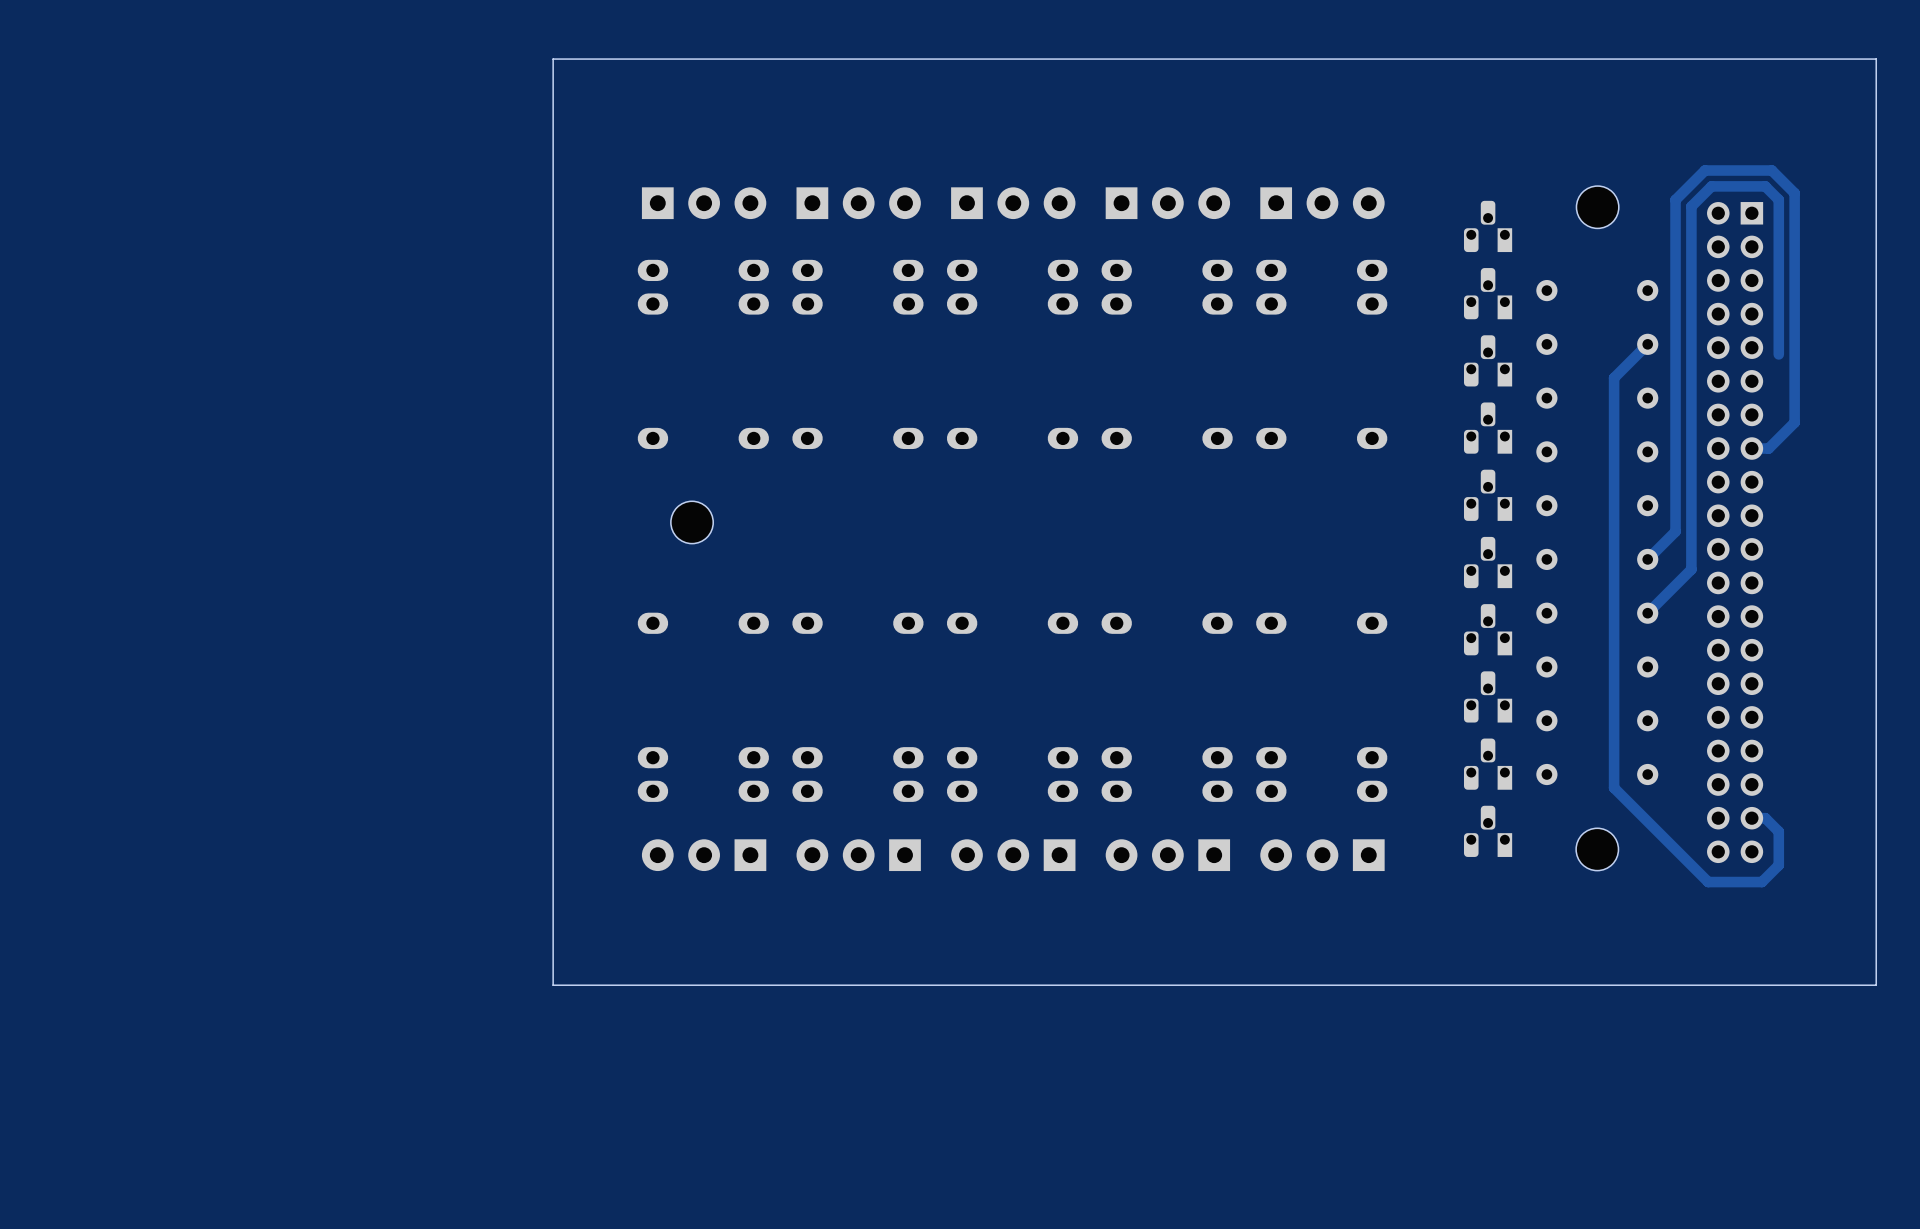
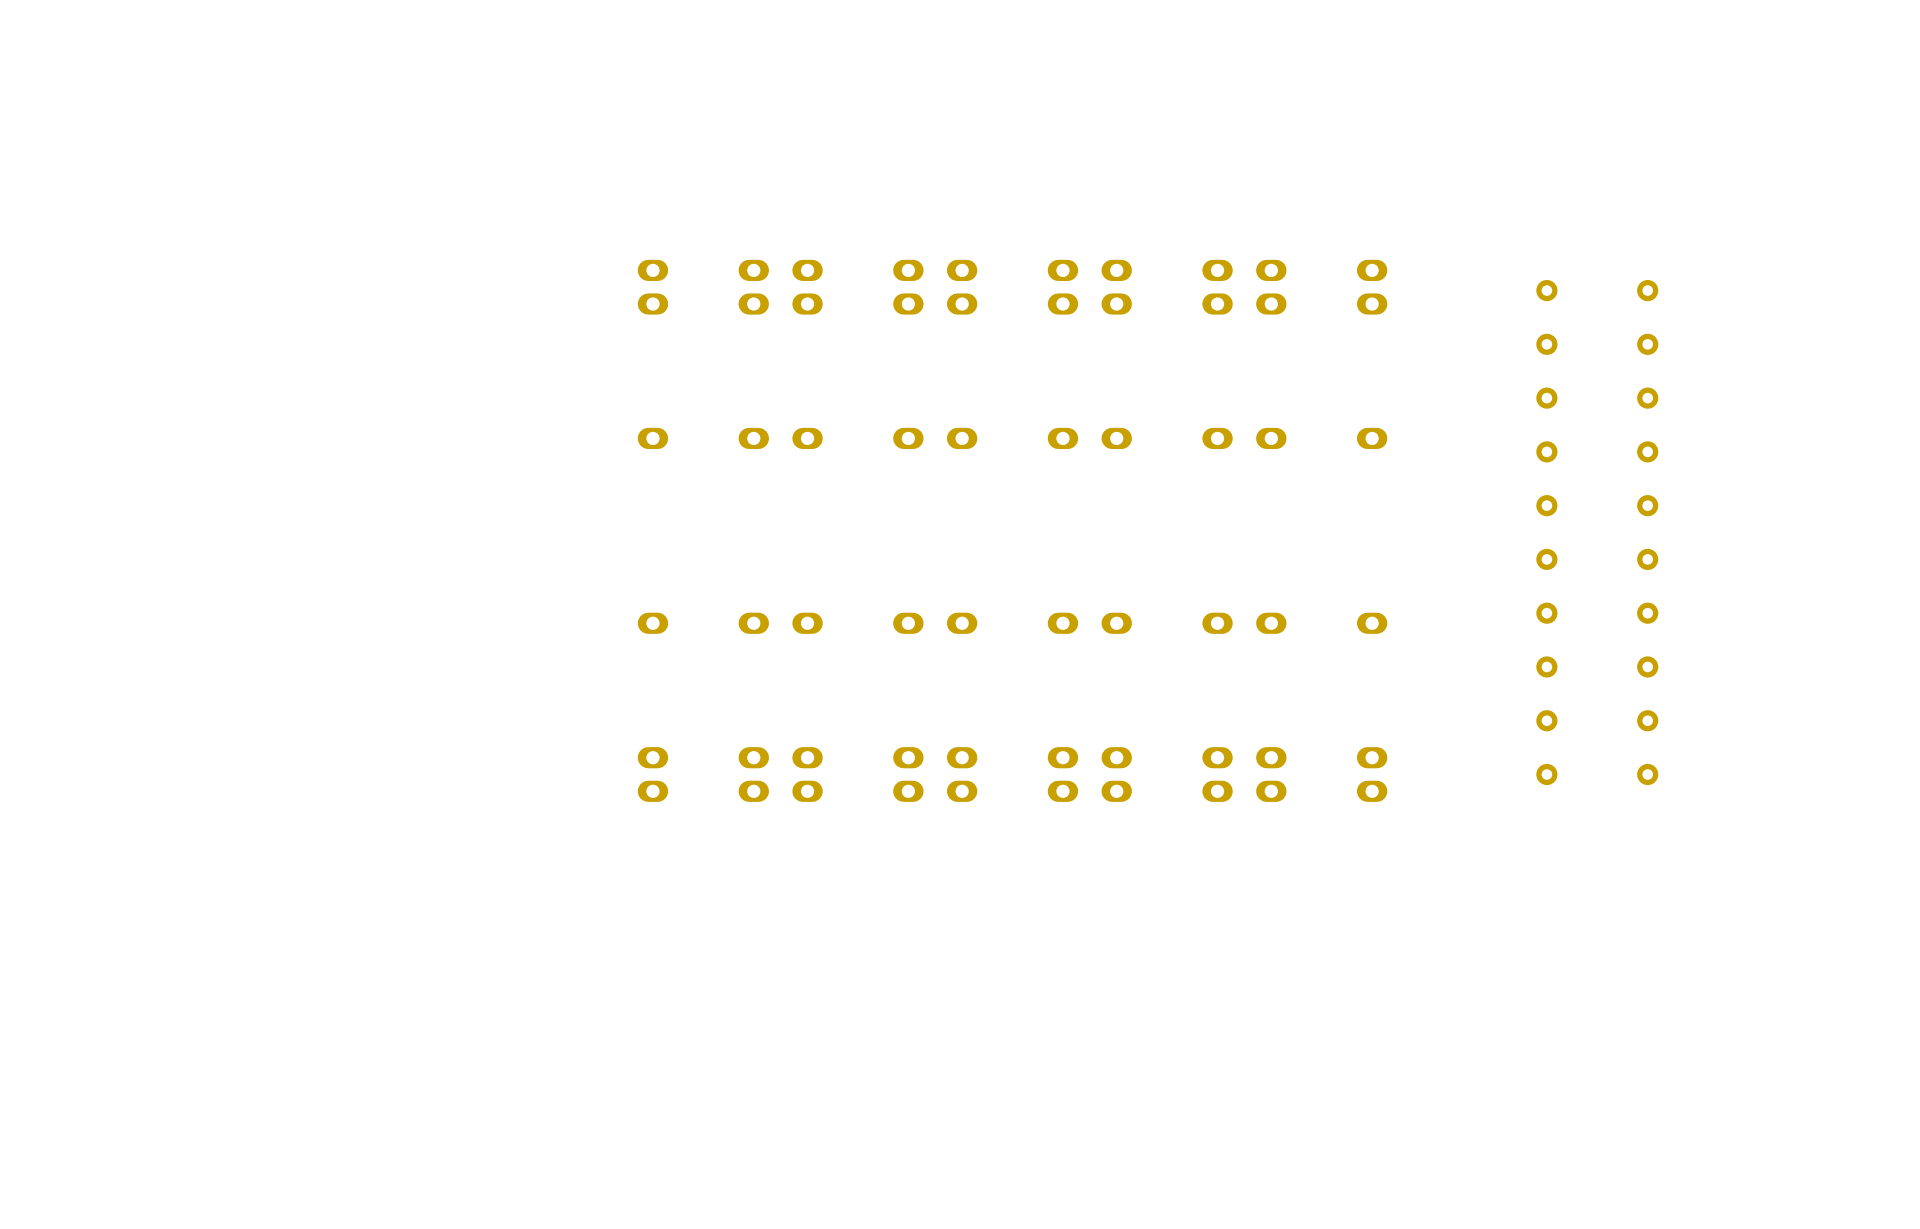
board edge: (1876, 59) (553, 59) (553, 985) (1876, 985) (1876, 59) -> none
part: (704, 203) -> none
part: (858, 203) -> none
part: (1013, 203) -> none
part: (1167, 203) -> none
part: (1322, 203) -> none
part: (1597, 207) -> none
part: (1488, 226) -> none
part: (1488, 293) -> none
track: (1647, 344) (1614, 377) (1614, 787) (1708, 882) (1761, 882) (1778, 865) (1778, 831) (1765, 818) (1751, 818) -> none
track: (1778, 354) (1778, 199) (1765, 186) (1711, 186) (1691, 206) (1691, 569) (1647, 613) -> none
part: (1488, 360) -> none
part: (1488, 428) -> none
track: (1751, 448) (1768, 448) (1794, 422) (1794, 193) (1771, 170) (1704, 170) (1675, 199) (1675, 531) (1647, 559) -> none
part: (1488, 495) -> none
part: (692, 522) -> none
part: (1735, 532) -> none
part: (1488, 562) -> none
part: (1488, 629) -> none
part: (1488, 696) -> none
part: (1488, 764) -> none
part: (1488, 831) -> none
part: (1597, 849) -> none
part: (704, 855) -> none
part: (858, 855) -> none
part: (1013, 855) -> none
part: (1167, 855) -> none
part: (1322, 855) -> none

